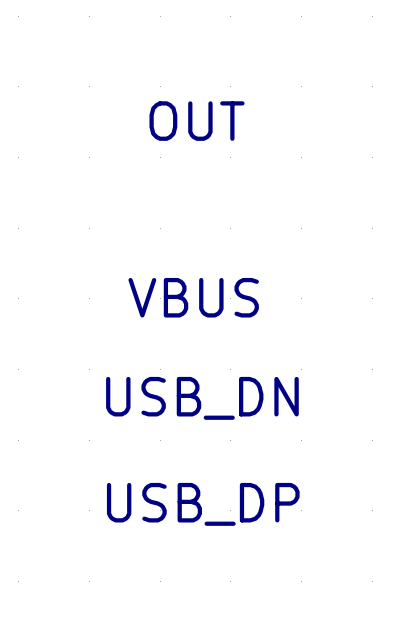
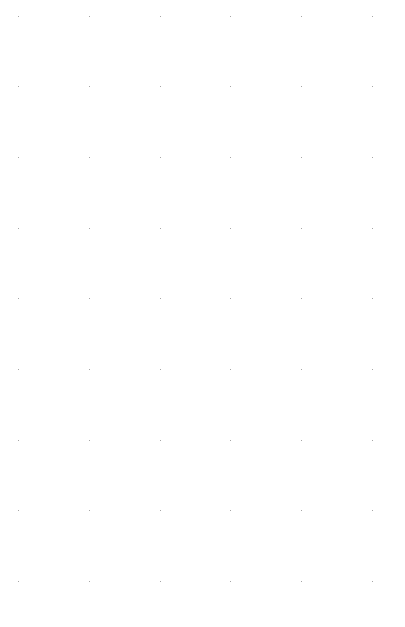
text: OUT (197, 121) -> none
text: VBUS (193, 297) -> none
text: USB_DN (202, 398) -> none
text: USB_DP (203, 504) -> none

